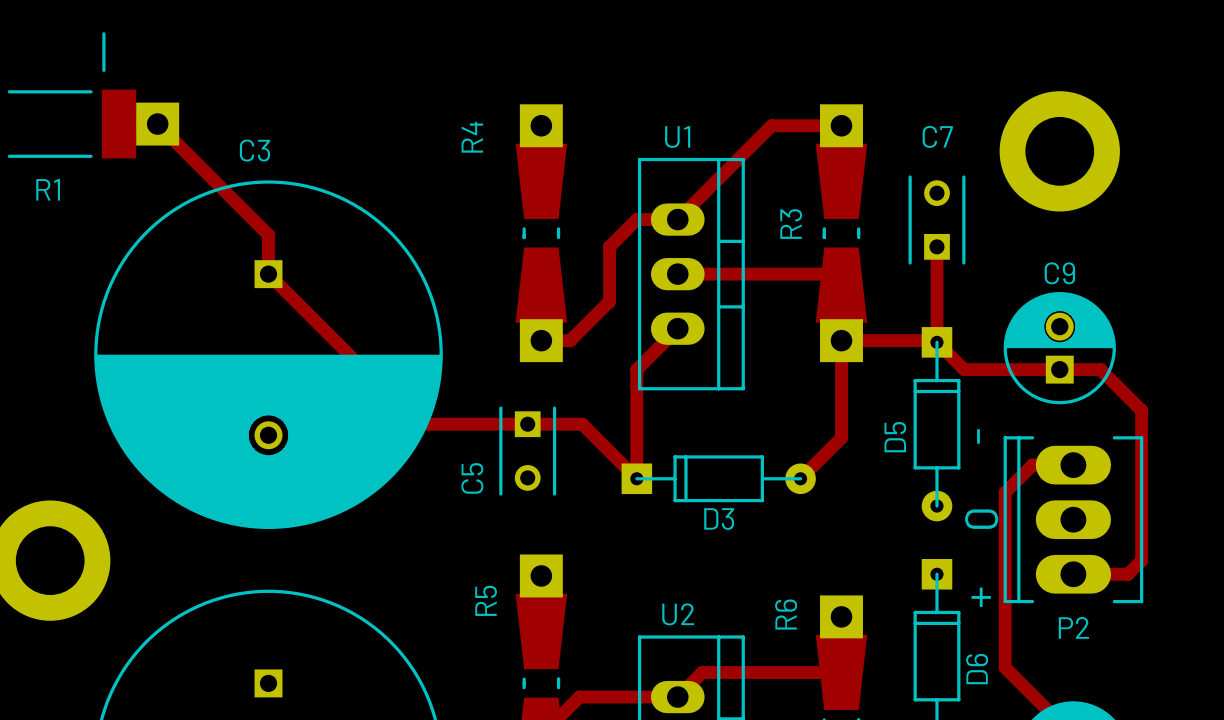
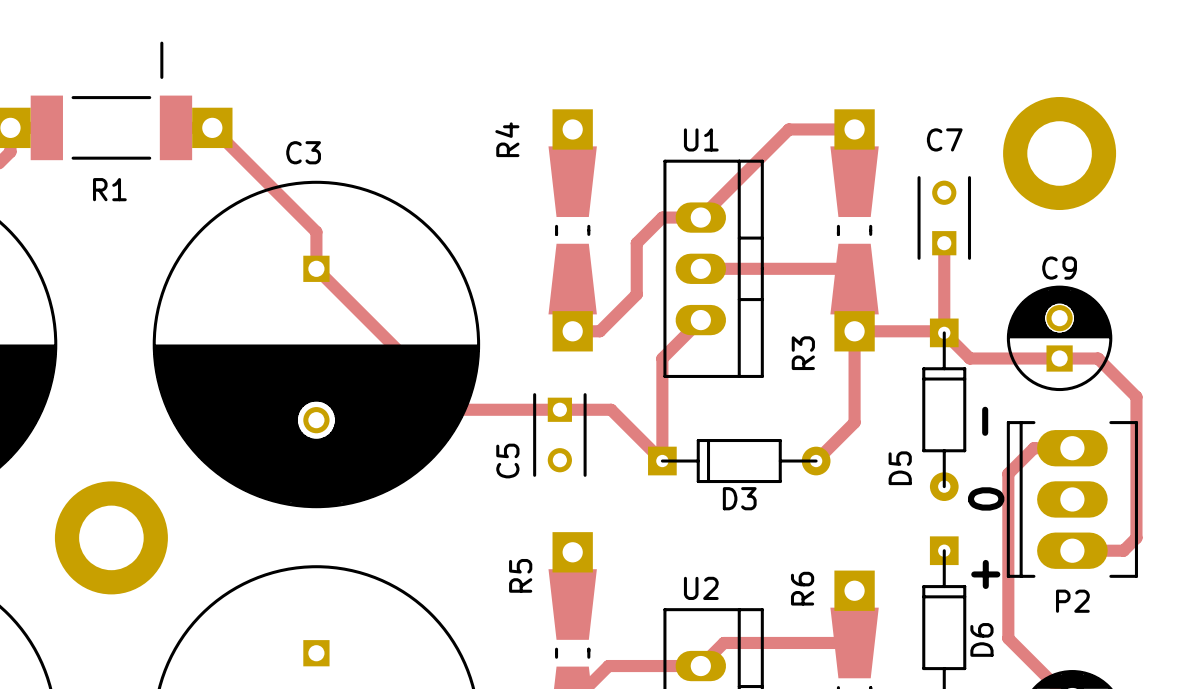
R3 name position: R3 (791, 224) -> R3 (803, 353)
D5 name position: D5 (895, 437) -> D5 (900, 468)

